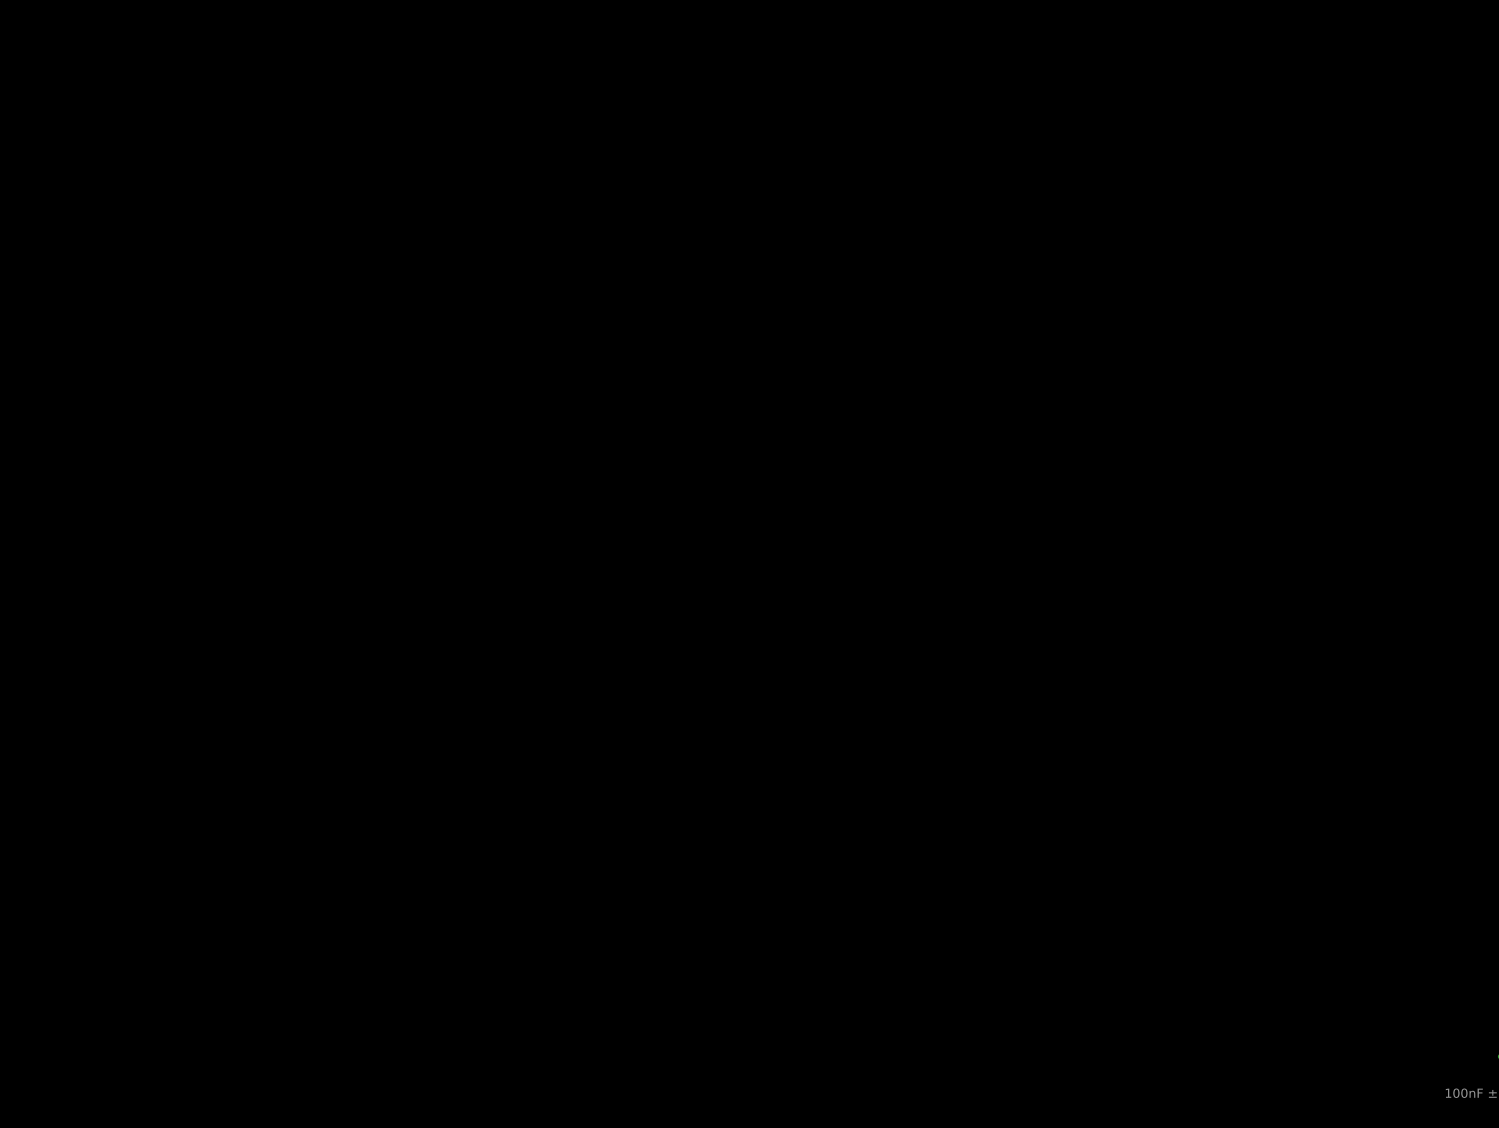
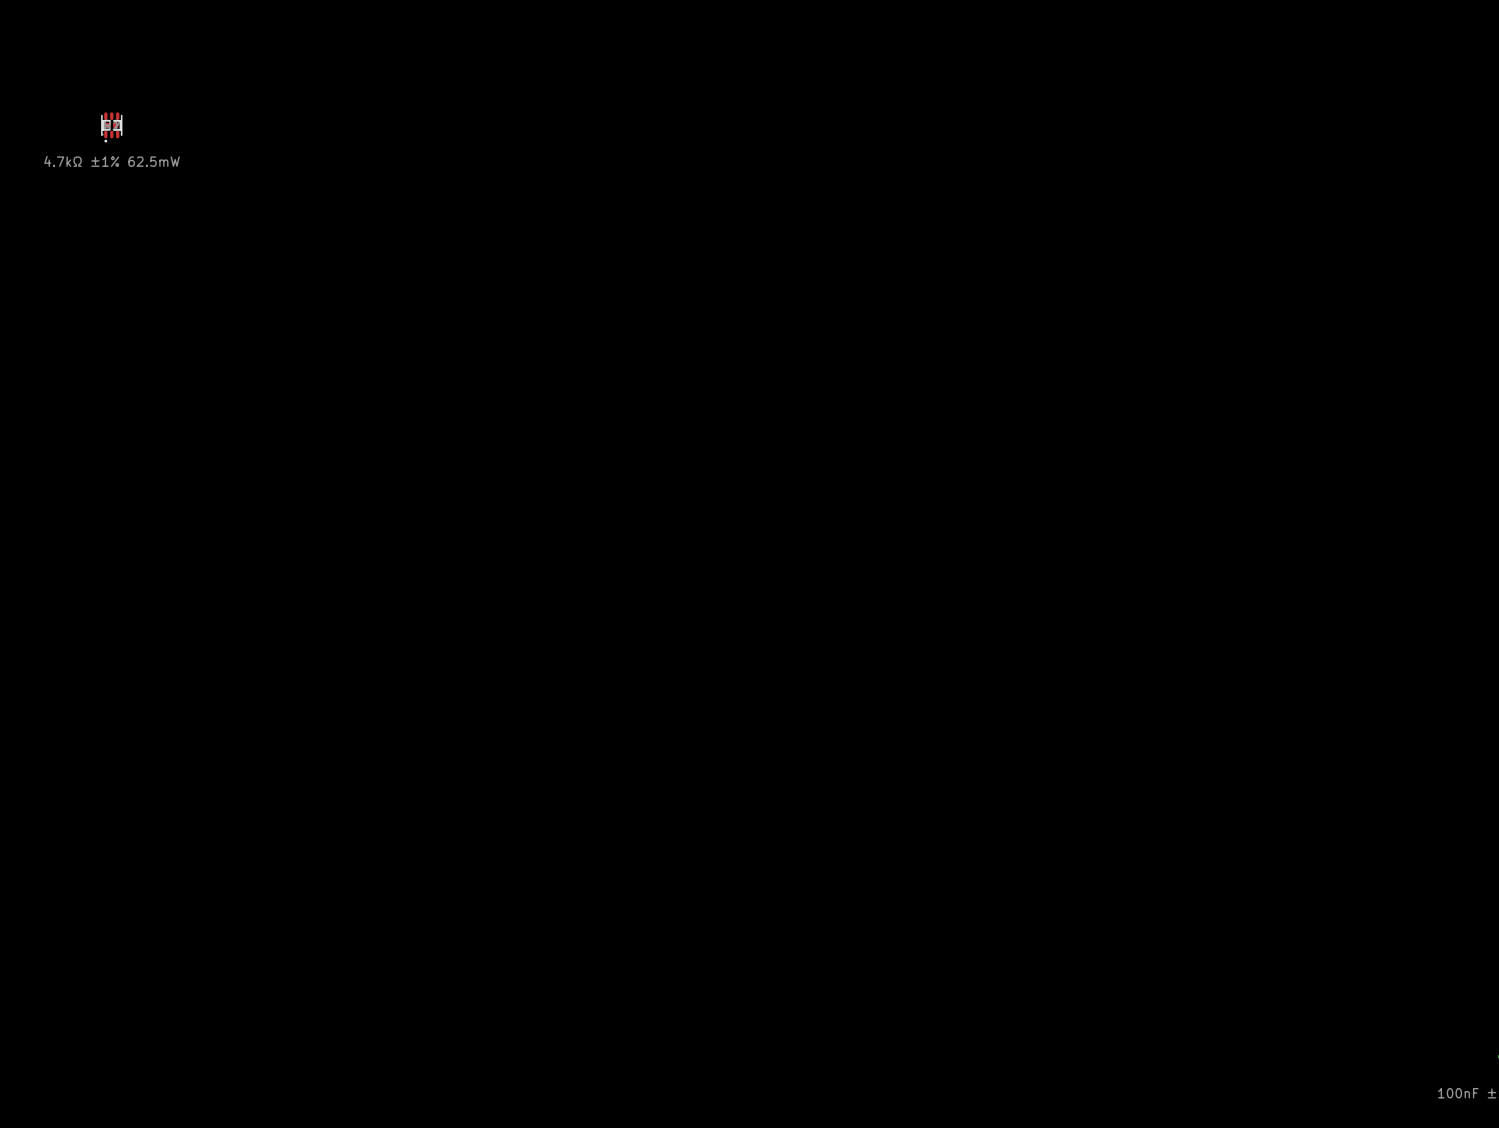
part: none -> 4.7kΩ ±1% 62.5mW (111, 125)
part: none -> (111, 127)

